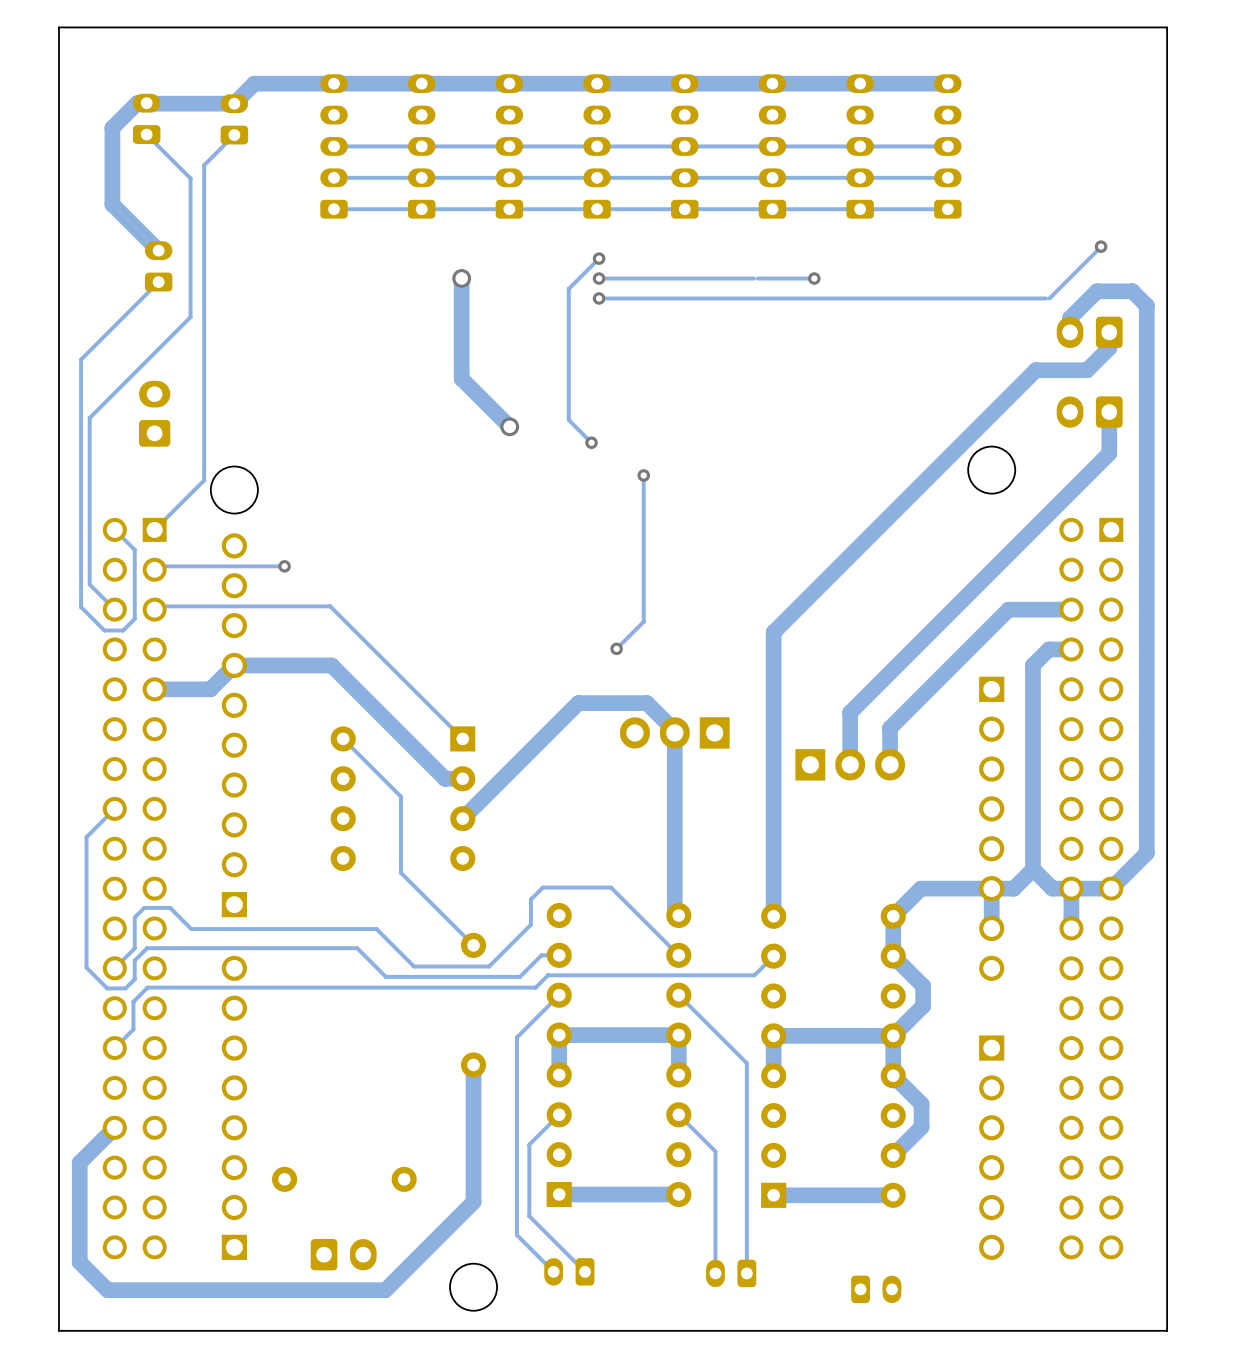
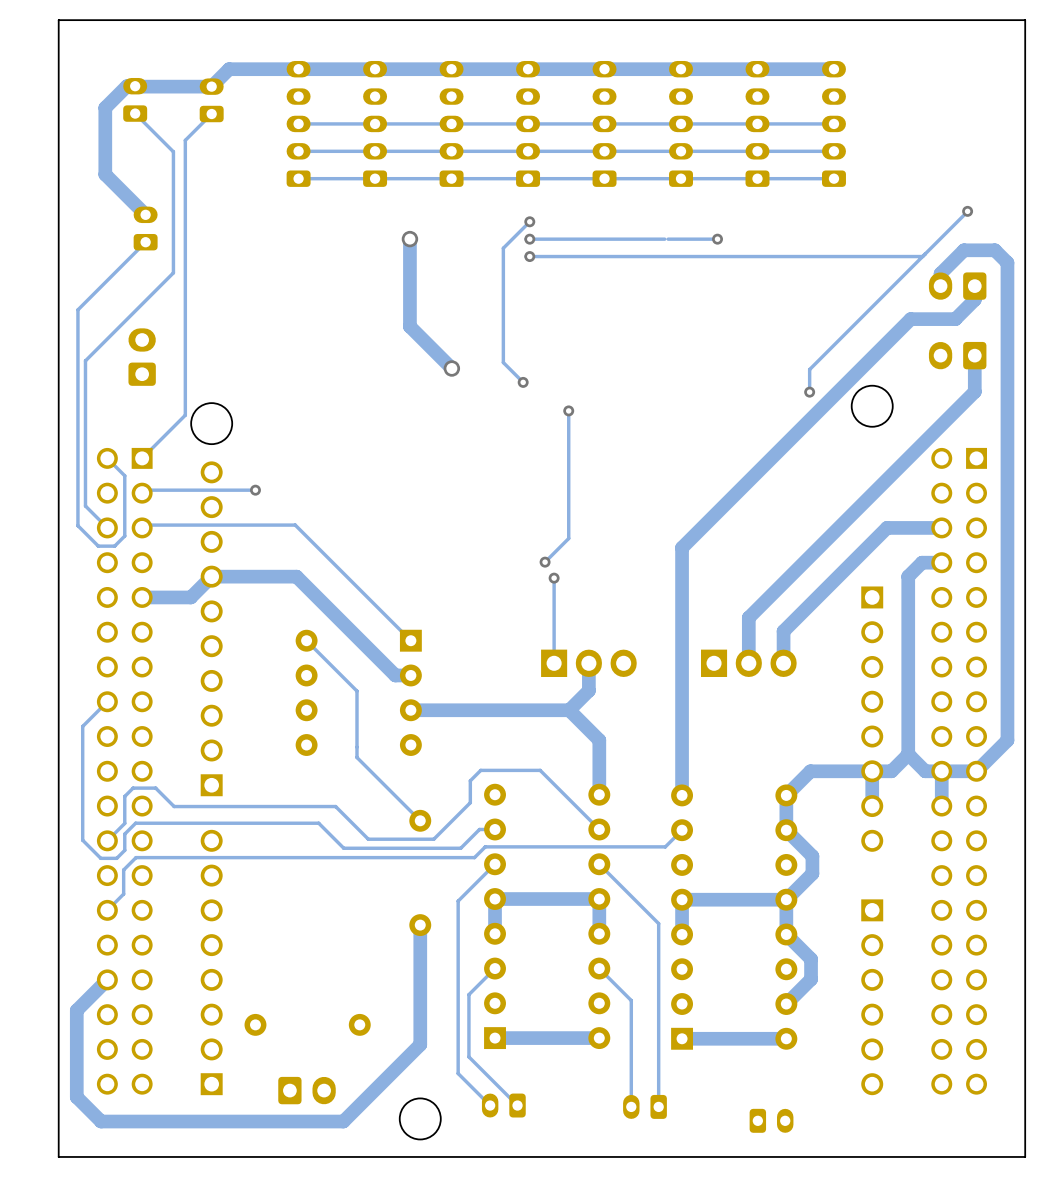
track: none -> (919, 256) (922, 256) (809, 369) (809, 392)
via: none -> (809, 392)
track: none -> (554, 578) (554, 663) (552, 663)
via: none -> (554, 578)
part rotation: 0° (674, 732) -> 180° (588, 663)
track: none -> (588, 663) (588, 690) (569, 710)
track: (462, 818) (578, 703) (647, 703) (674, 730) (674, 911) (678, 915) -> (410, 710) (569, 710)
track: none -> (569, 710) (599, 740) (599, 794)

